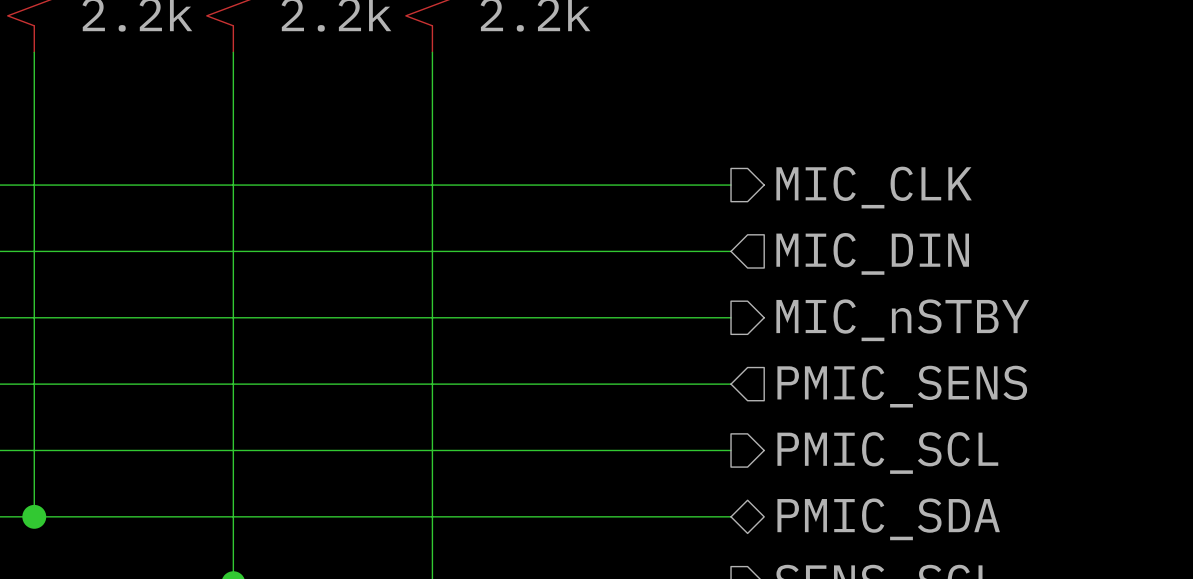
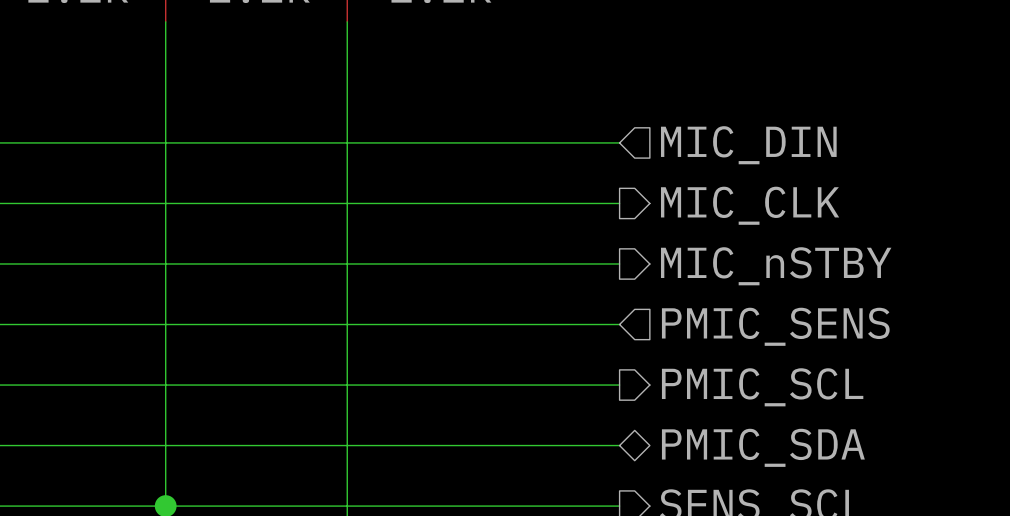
hierarchical label shape: output (874, 187) -> input (748, 145)
hierarchical label: MIC_CLK (874, 187) -> MIC_DIN (748, 145)
hierarchical label shape: input (872, 253) -> output (750, 205)
hierarchical label: MIC_DIN (872, 253) -> MIC_CLK (750, 205)

